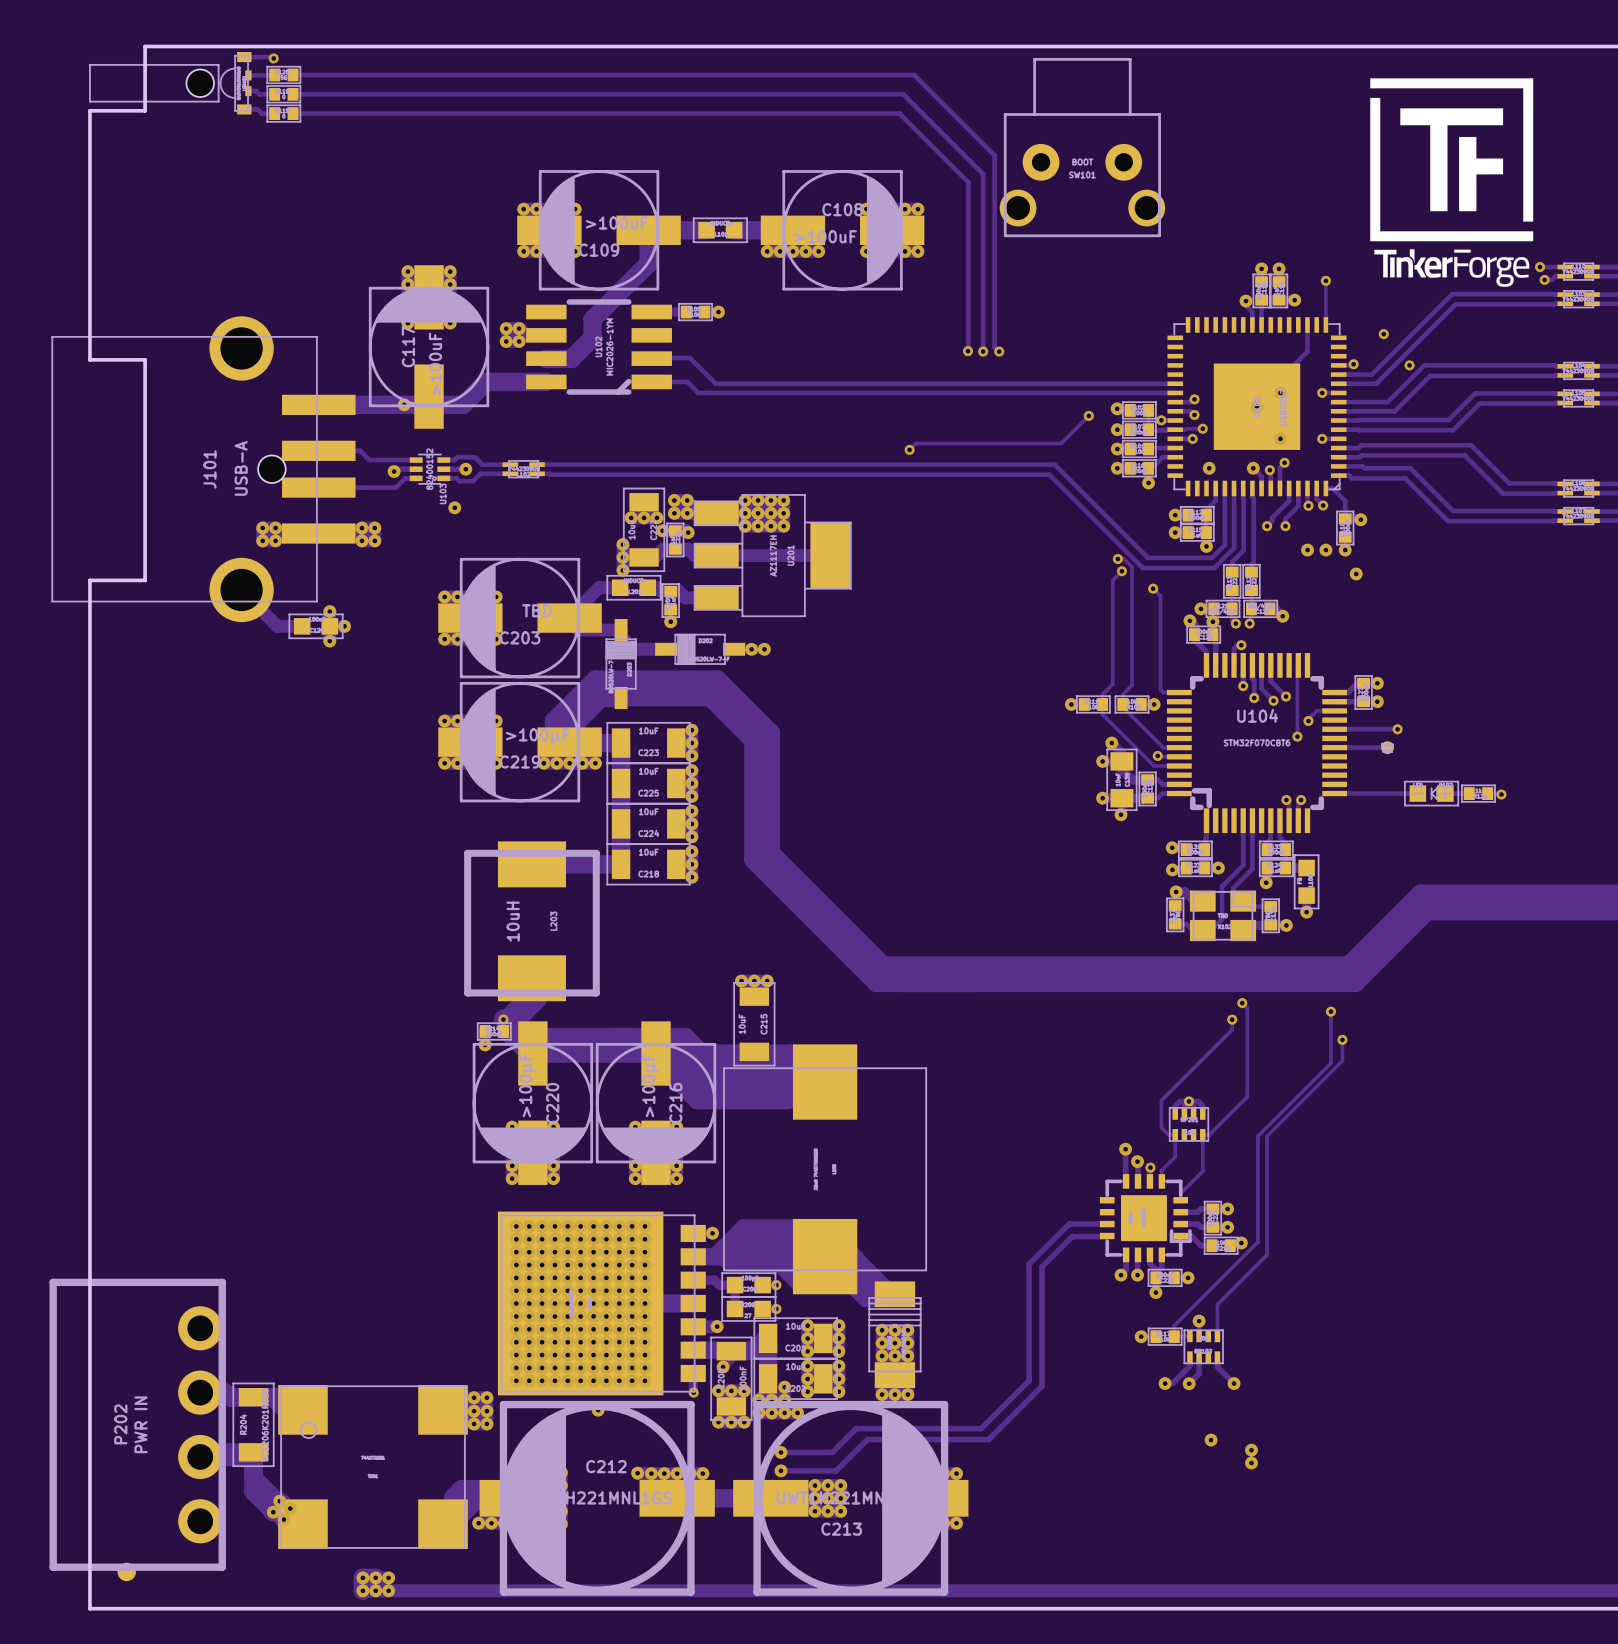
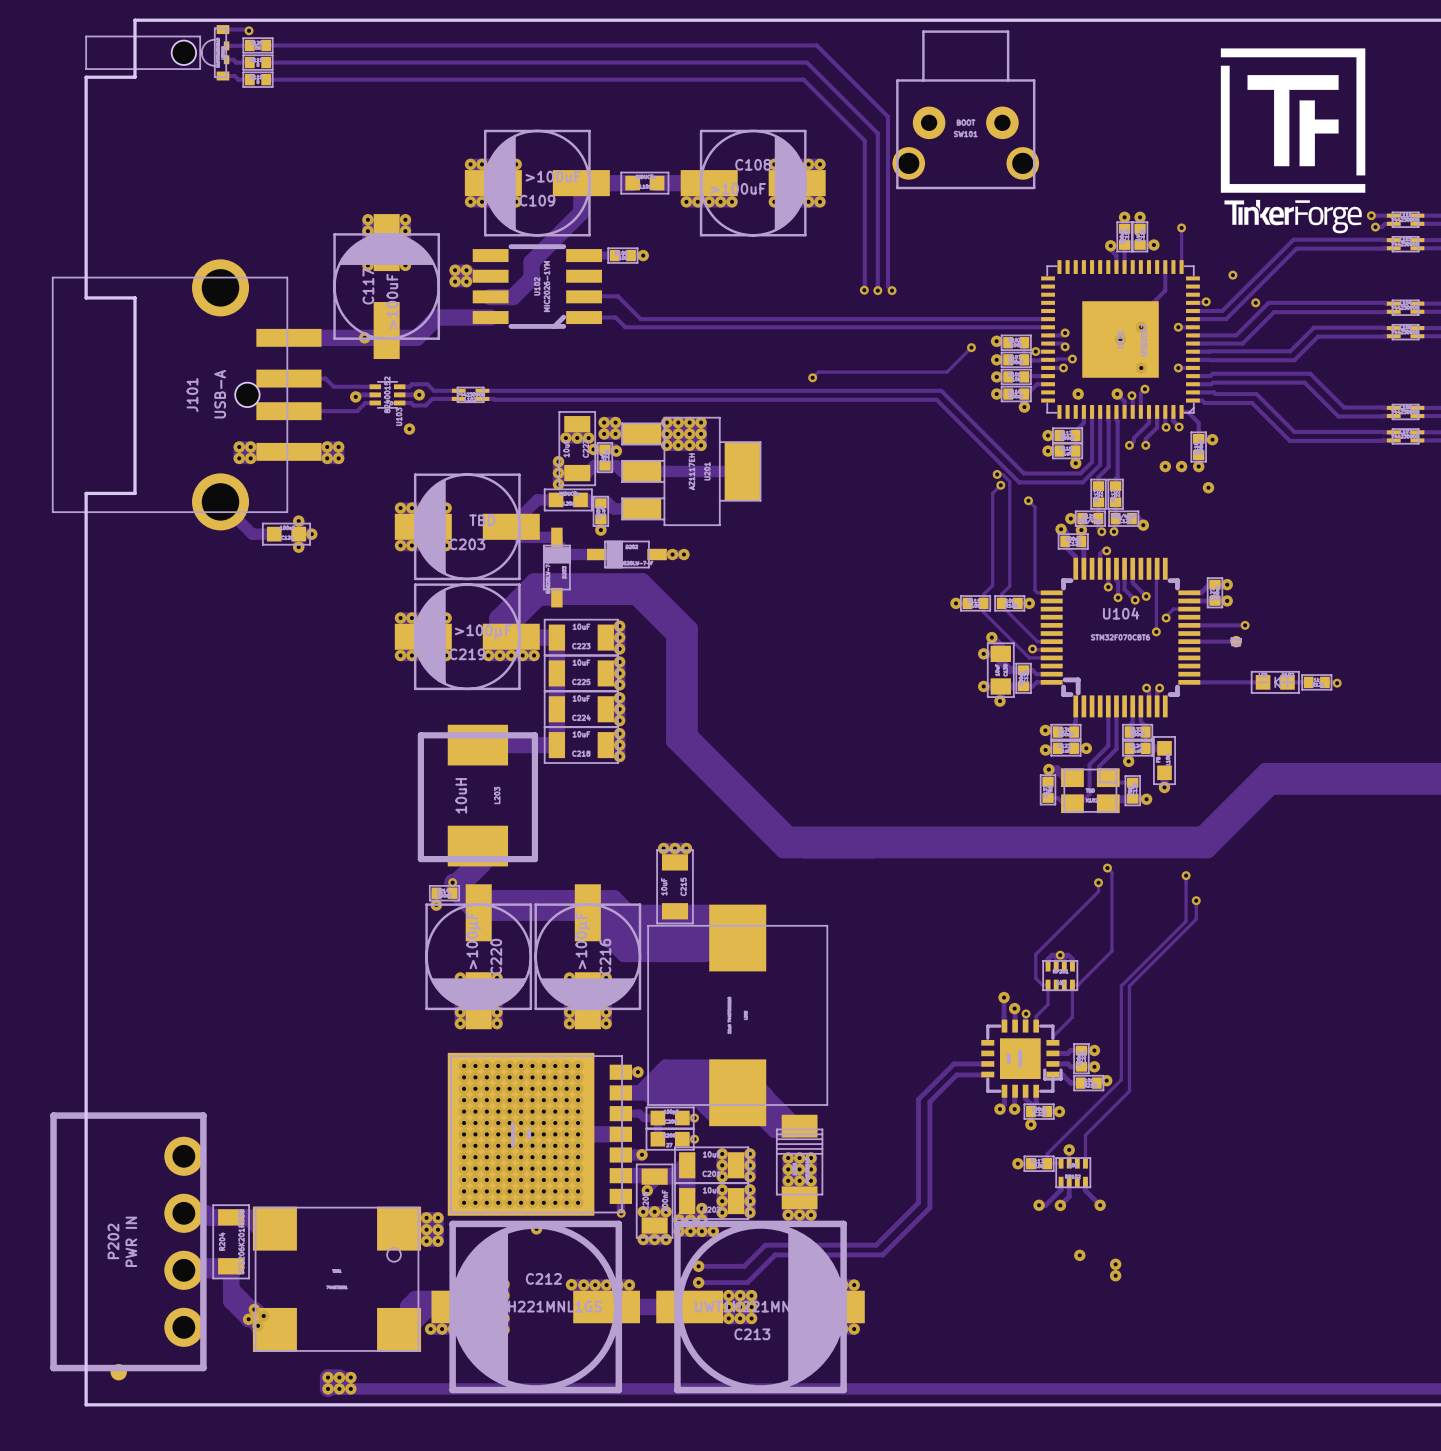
part footprint: [278, 1385, 468, 1550] -> [252, 1206, 422, 1352]

